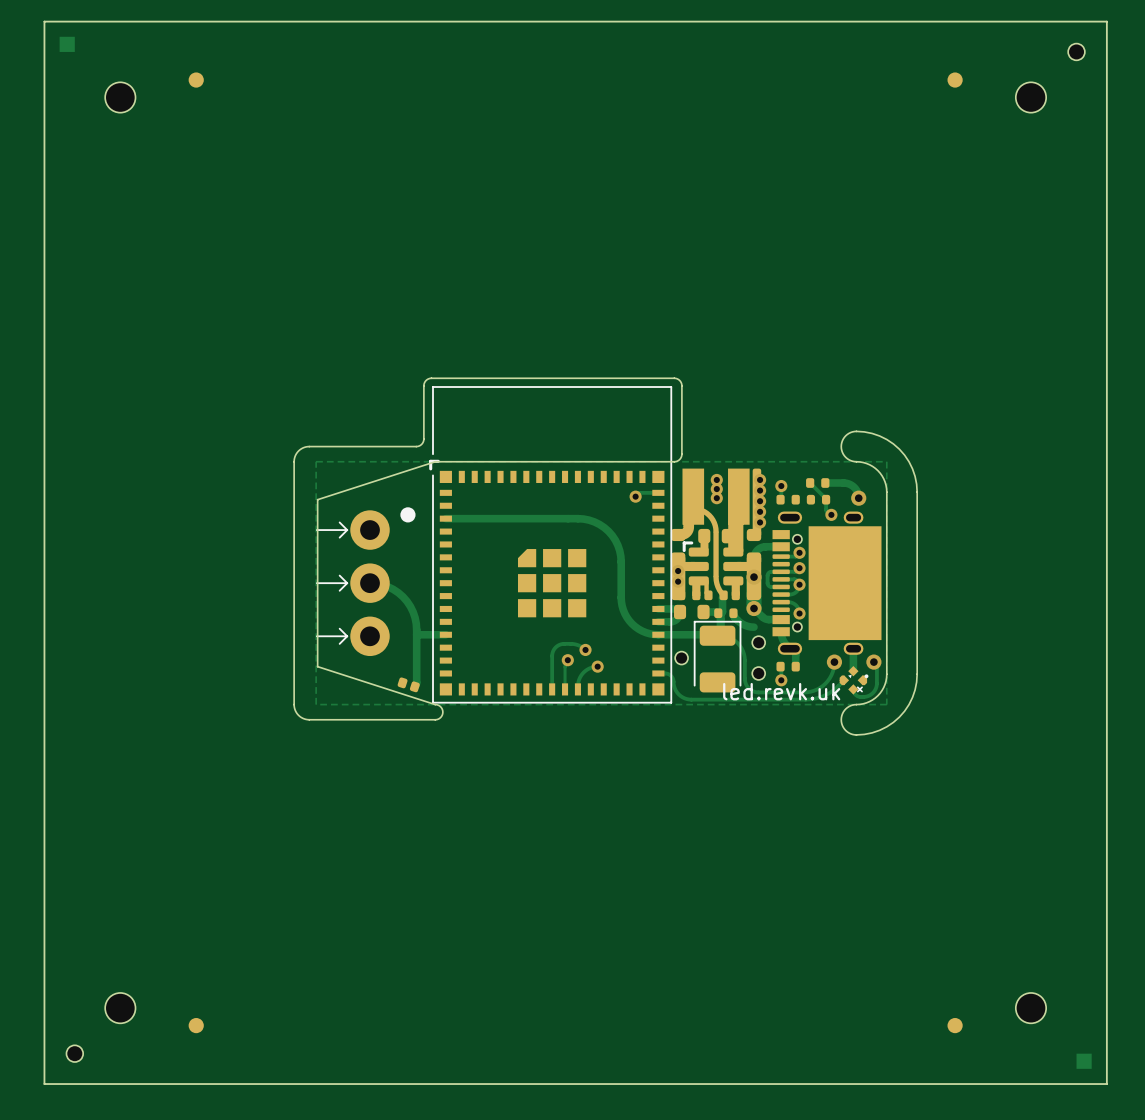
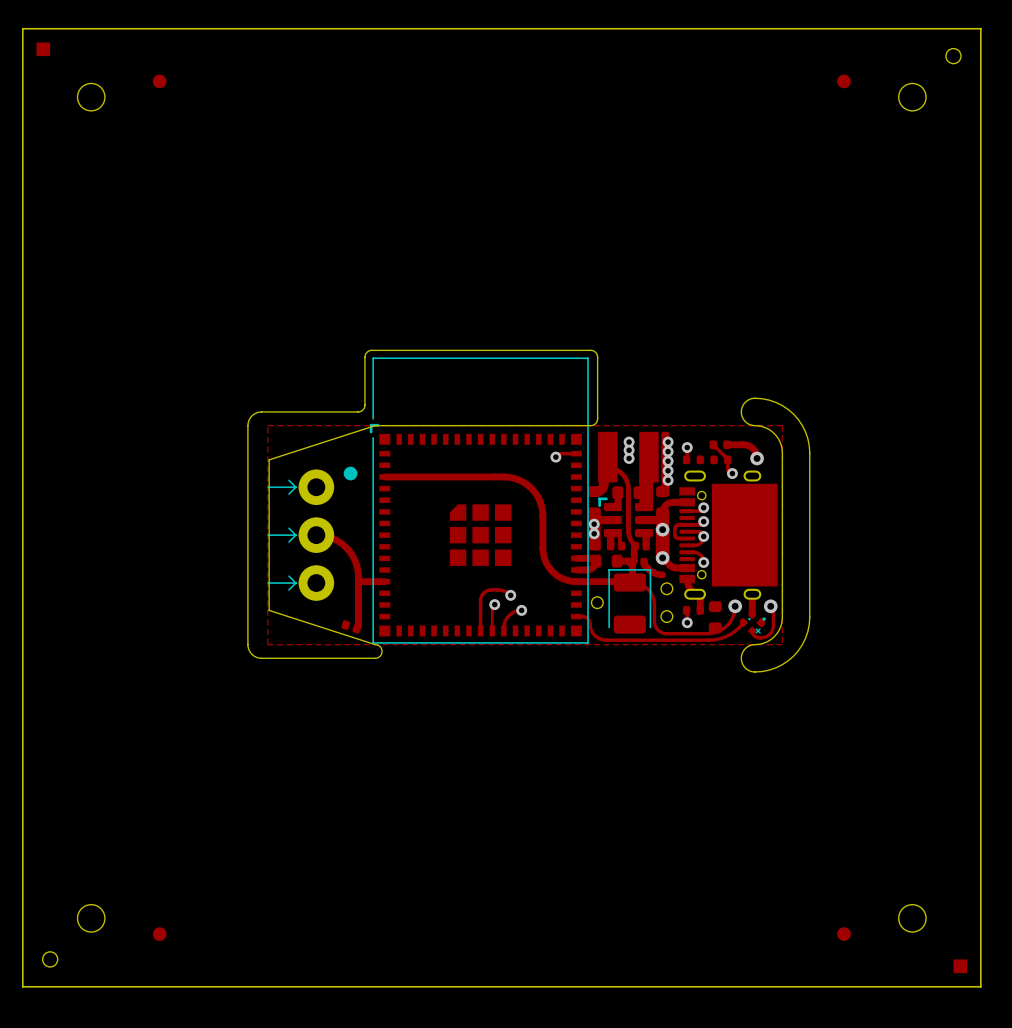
part: none -> (715, 617)
text: led.revk.uk (781, 691) -> none

